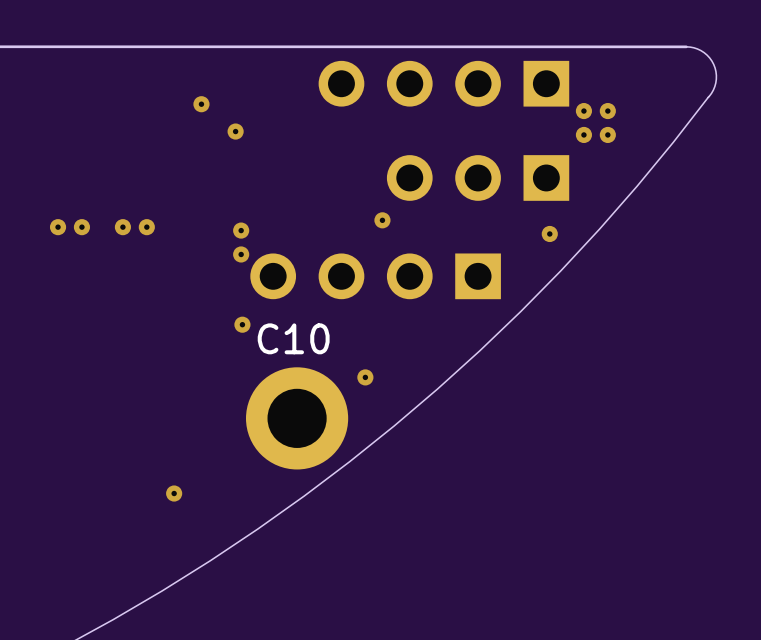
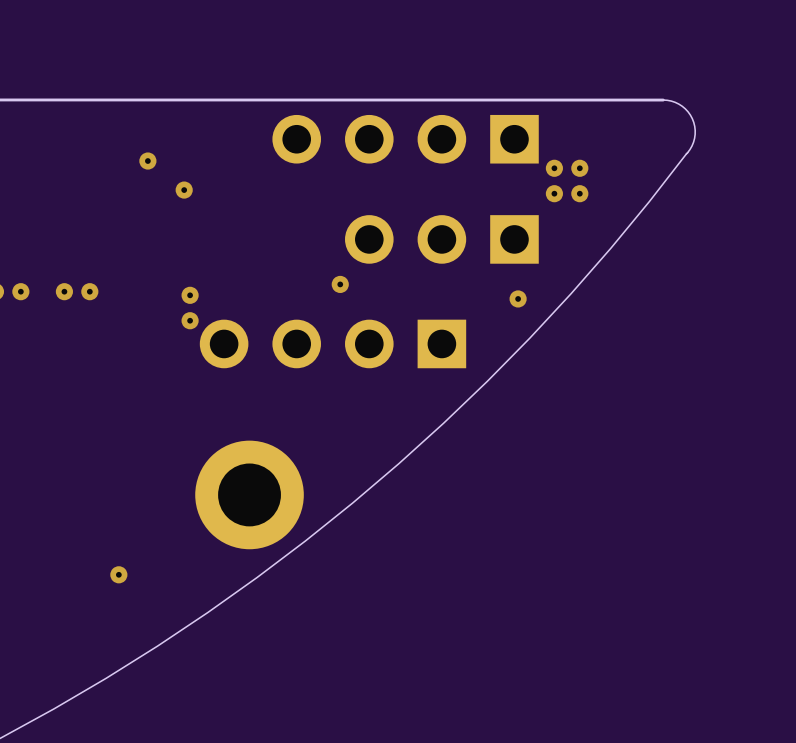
via: (242, 324) -> none
C10: (293, 338) -> none
via: (365, 377) -> none

